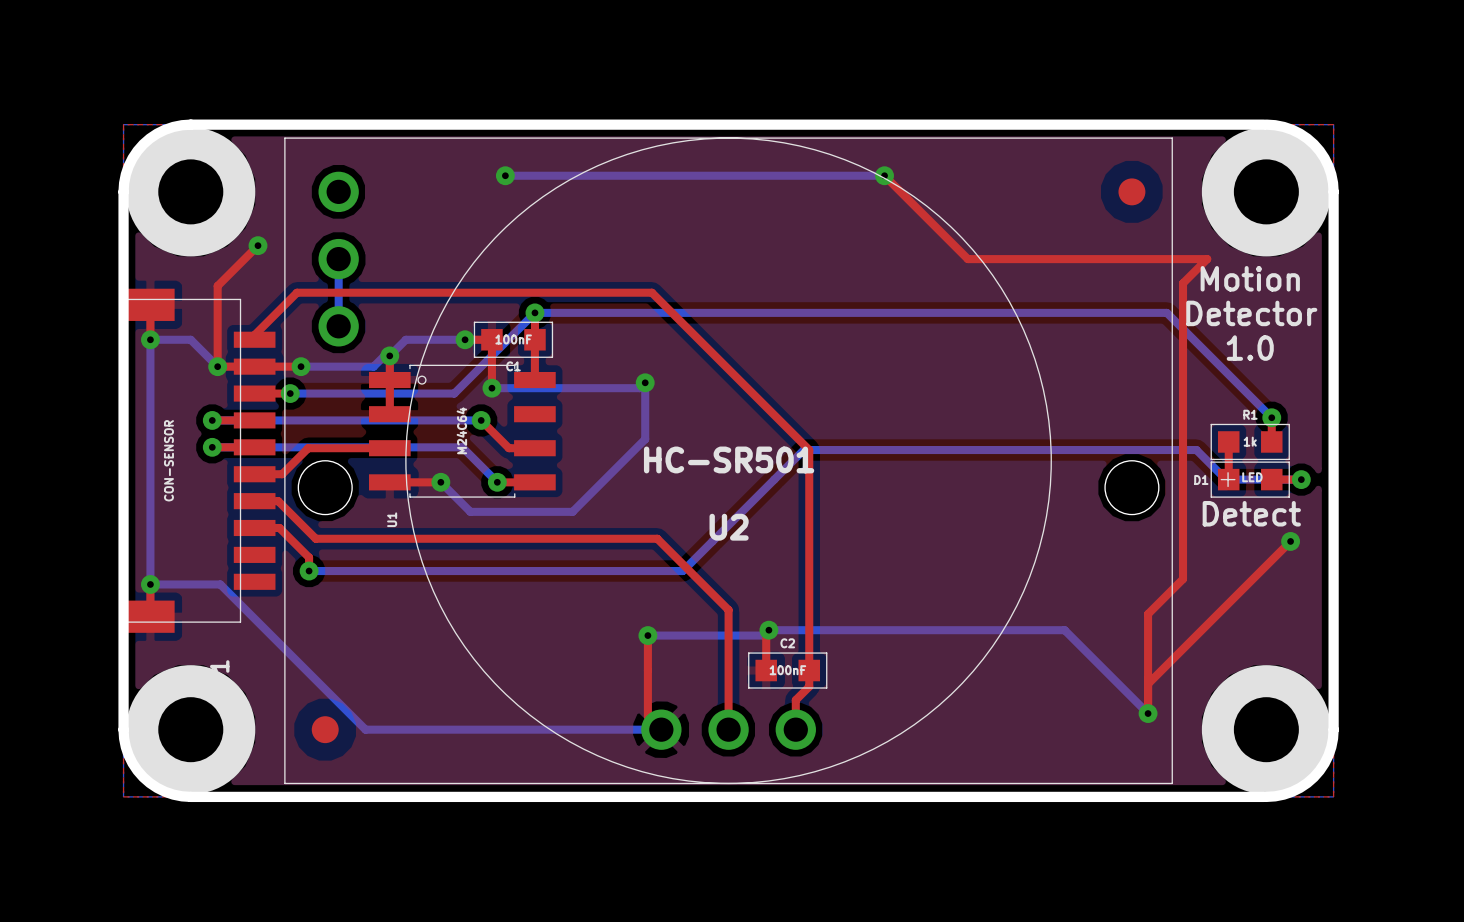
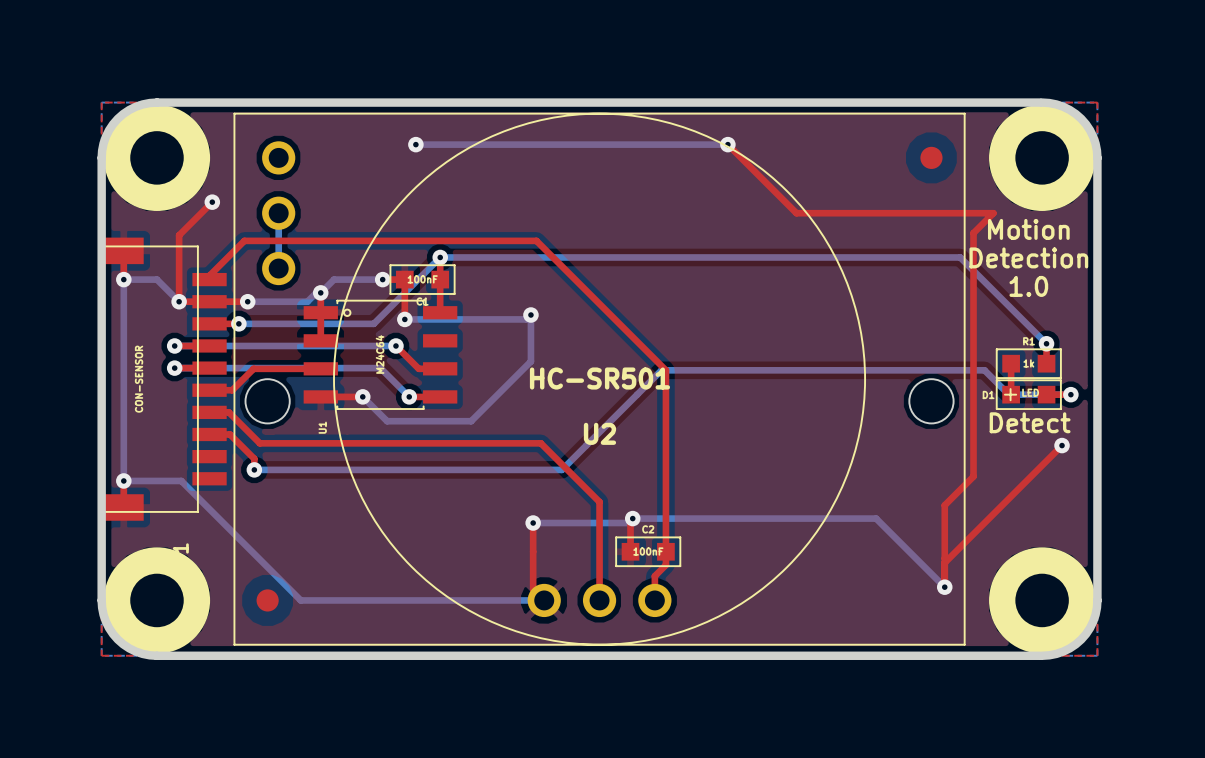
text: Detector (1251, 313) -> Detection (1028, 257)

